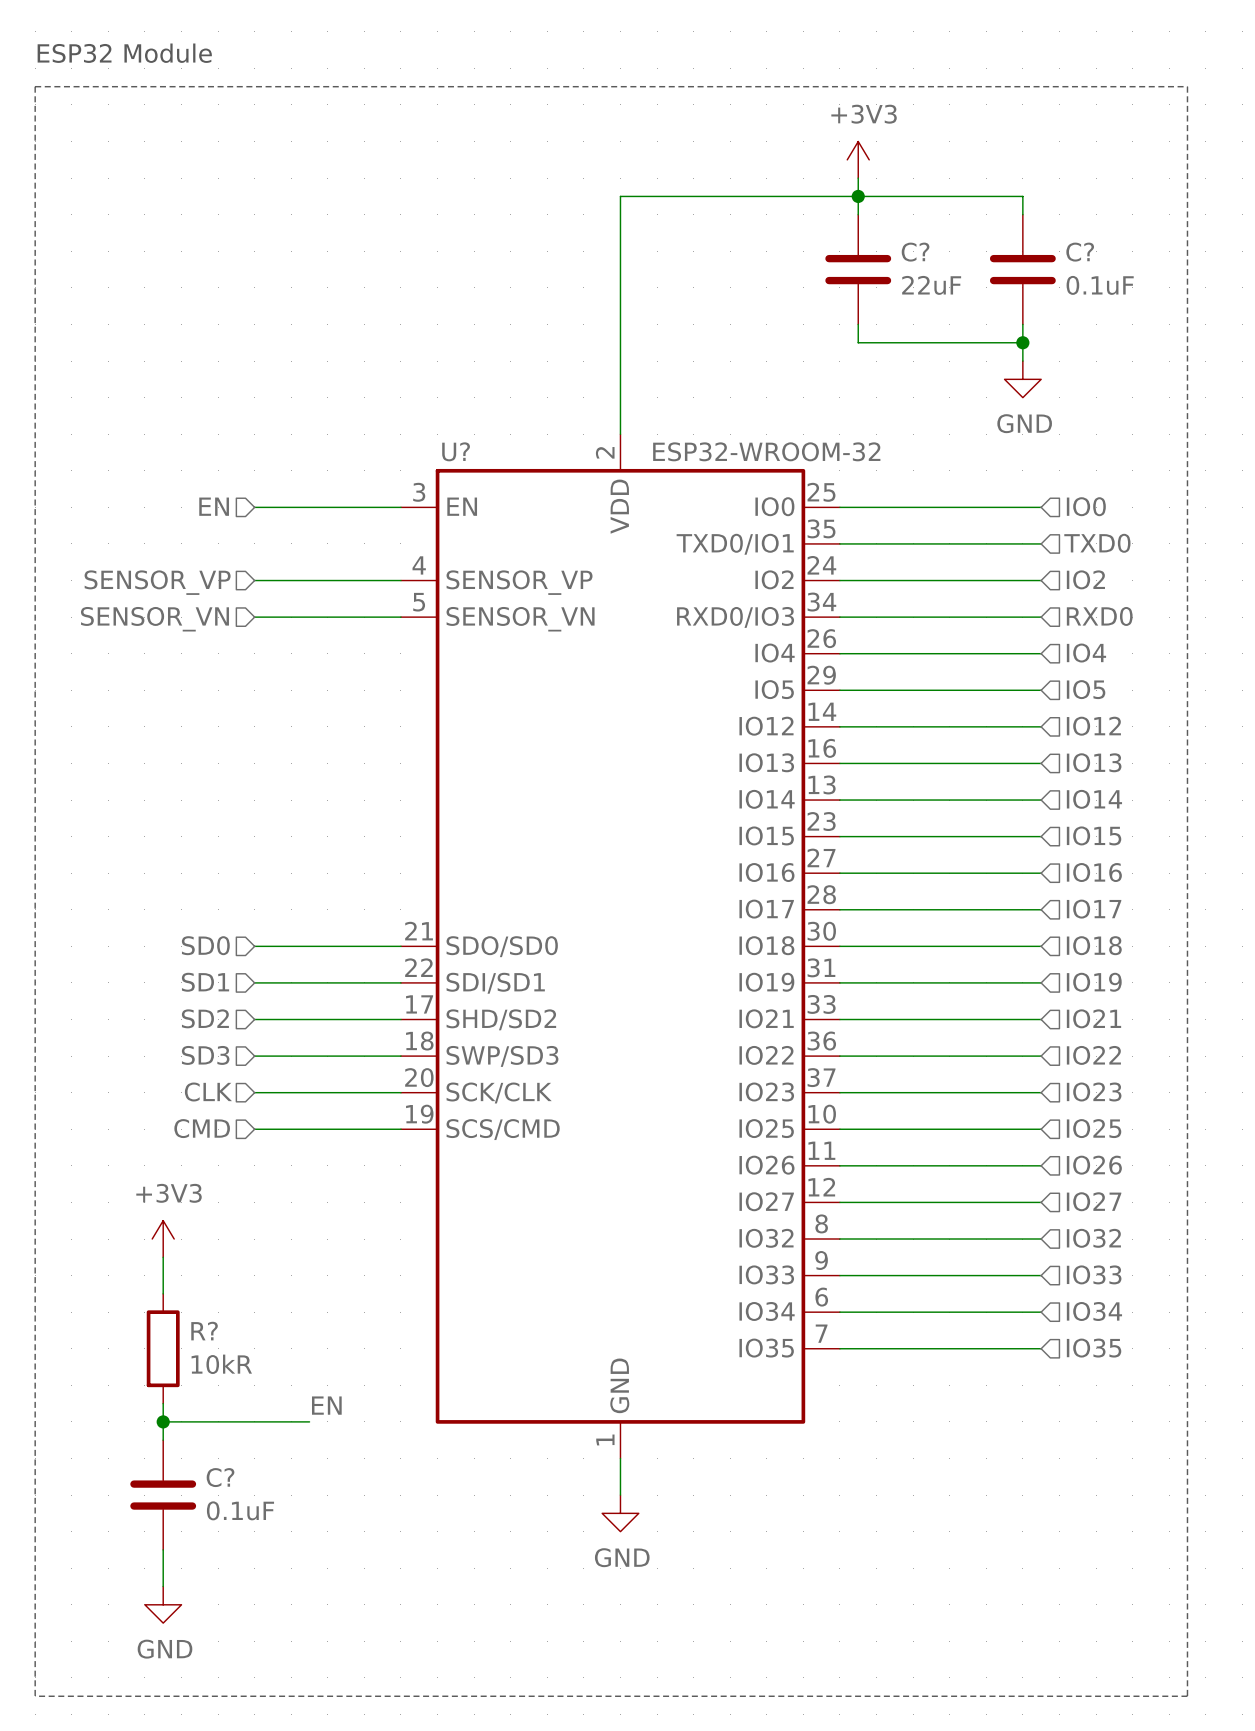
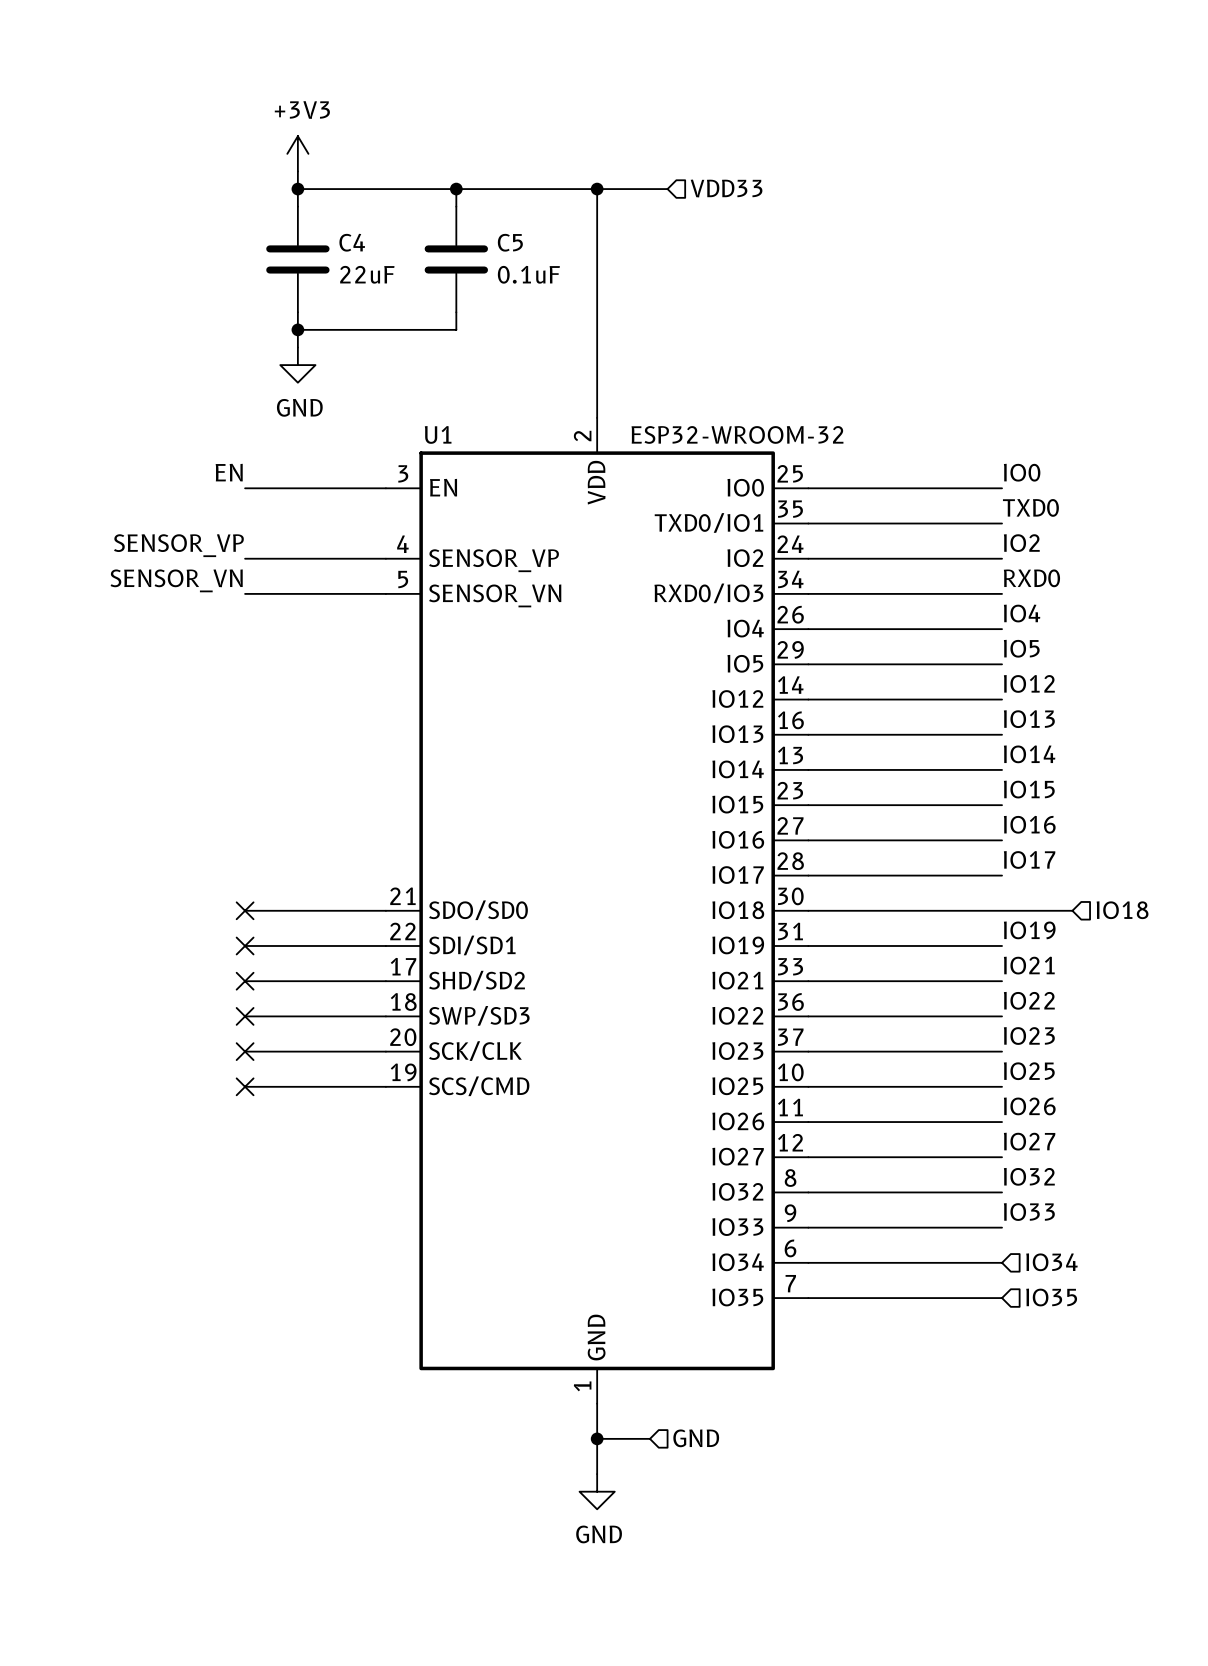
text: ESP32 Module (124, 53) -> none
line: (35, 86) (1187, 86) (1187, 1696) (35, 1696) (35, 86) -> none
power symbol: none -> +3V3 (297, 153)
power symbol: +3V3 (858, 159) -> none
wire: none -> (297, 171) (297, 206)
wire: (858, 178) (858, 214) -> none
hierarchical label: none -> VDD33 (726, 188)
wire: none -> (297, 189) (597, 189)
junction: none -> (297, 189)
wire: none -> (456, 189) (456, 206)
junction: none -> (456, 189)
junction: none -> (597, 189)
wire: (693, 196) (1022, 196) (1022, 214) -> none
junction: (858, 196) -> none
C4: none -> 22uF (297, 259)
C5: none -> 0.1uF (456, 259)
C?: 22uF (858, 269) -> none
C?: 0.1uF (1022, 269) -> none
wire: none -> (297, 312) (297, 347)
wire: none -> (456, 312) (456, 329) (297, 329)
wire: (858, 324) (858, 342) (1022, 342) -> none
wire: (1022, 324) (1022, 361) -> none
junction: none -> (297, 329)
junction: (1022, 342) -> none
power symbol: none -> GND (297, 365)
power symbol: GND (1022, 379) -> none
U? name: U? (456, 451) -> U1 (438, 434)
label: none -> EN (229, 472)
label: none -> IO0 (1022, 472)
hierarchical label: EN (214, 506) -> none
hierarchical label: IO0 (1086, 506) -> none
label: none -> TXD0 (1030, 507)
hierarchical label: TXD0 (1097, 543) -> none
label: none -> IO2 (1021, 543)
label: none -> SENSOR_VP (178, 545)
hierarchical label: IO2 (1085, 579) -> none
hierarchical label: SENSOR_VP (157, 582) -> none
label: none -> RXD0 (1031, 578)
label: none -> SENSOR_VN (176, 580)
hierarchical label: RXD0 (1099, 616) -> none
hierarchical label: SENSOR_VN (154, 619) -> none
label: none -> IO4 (1022, 613)
hierarchical label: IO4 (1086, 653) -> none
label: none -> IO5 (1021, 648)
hierarchical label: IO5 (1086, 689) -> none
label: none -> IO12 (1029, 683)
hierarchical label: IO12 (1093, 726) -> none
label: none -> IO13 (1029, 719)
hierarchical label: IO13 (1094, 762) -> none
label: none -> IO14 (1029, 754)
hierarchical label: IO14 (1094, 799) -> none
label: none -> IO15 (1029, 789)
hierarchical label: IO15 (1094, 835) -> none
label: none -> IO16 (1029, 824)
hierarchical label: IO16 (1094, 872) -> none
label: none -> IO17 (1029, 859)
hierarchical label: IO17 (1094, 909) -> none
hierarchical label: SD0 (205, 945) -> none
hierarchical label position: IO18 (1094, 945) -> IO18 (1122, 910)
no-connect mark: none -> (245, 910)
wire: none -> (1002, 910) (1072, 910)
label: none -> IO19 (1029, 930)
hierarchical label: SD1 (205, 982) -> none
no-connect mark: none -> (245, 945)
hierarchical label: IO19 (1094, 982) -> none
label: none -> IO21 (1029, 965)
hierarchical label: SD2 (205, 1018) -> none
hierarchical label: IO21 (1093, 1018) -> none
no-connect mark: none -> (245, 981)
label: none -> IO22 (1029, 1000)
hierarchical label: SD3 (205, 1055) -> none
hierarchical label: IO22 (1093, 1055) -> none
no-connect mark: none -> (245, 1016)
label: none -> IO23 (1029, 1036)
hierarchical label: CLK (208, 1092) -> none
no-connect mark: none -> (245, 1051)
hierarchical label: IO23 (1094, 1092) -> none
label: none -> IO25 (1029, 1071)
hierarchical label: CMD (202, 1128) -> none
hierarchical label: IO25 (1094, 1128) -> none
no-connect mark: none -> (245, 1086)
label: none -> IO26 (1029, 1106)
hierarchical label: IO26 (1094, 1165) -> none
label: none -> IO27 (1029, 1141)
hierarchical label: IO27 (1094, 1201) -> none
label: none -> IO32 (1029, 1176)
hierarchical label: IO32 (1093, 1238) -> none
power symbol: +3V3 (163, 1239) -> none
wire: (163, 1257) (163, 1293) -> none
label: none -> IO33 (1029, 1212)
hierarchical label: IO33 (1094, 1274) -> none
R?: 10kR (163, 1348) -> none
wire: (163, 1403) (163, 1440) -> none
label: EN (326, 1405) -> none
wire: (163, 1421) (309, 1421) -> none
junction: (163, 1421) -> none
hierarchical label: none -> GND (696, 1438)
C?: 0.1uF (163, 1495) -> none
junction: none -> (597, 1438)
wire: none -> (649, 1438) (597, 1438) (597, 1474)
power symbol position: GND (620, 1513) -> GND (597, 1491)
wire: (163, 1549) (163, 1586) -> none
power symbol: GND (163, 1604) -> none

